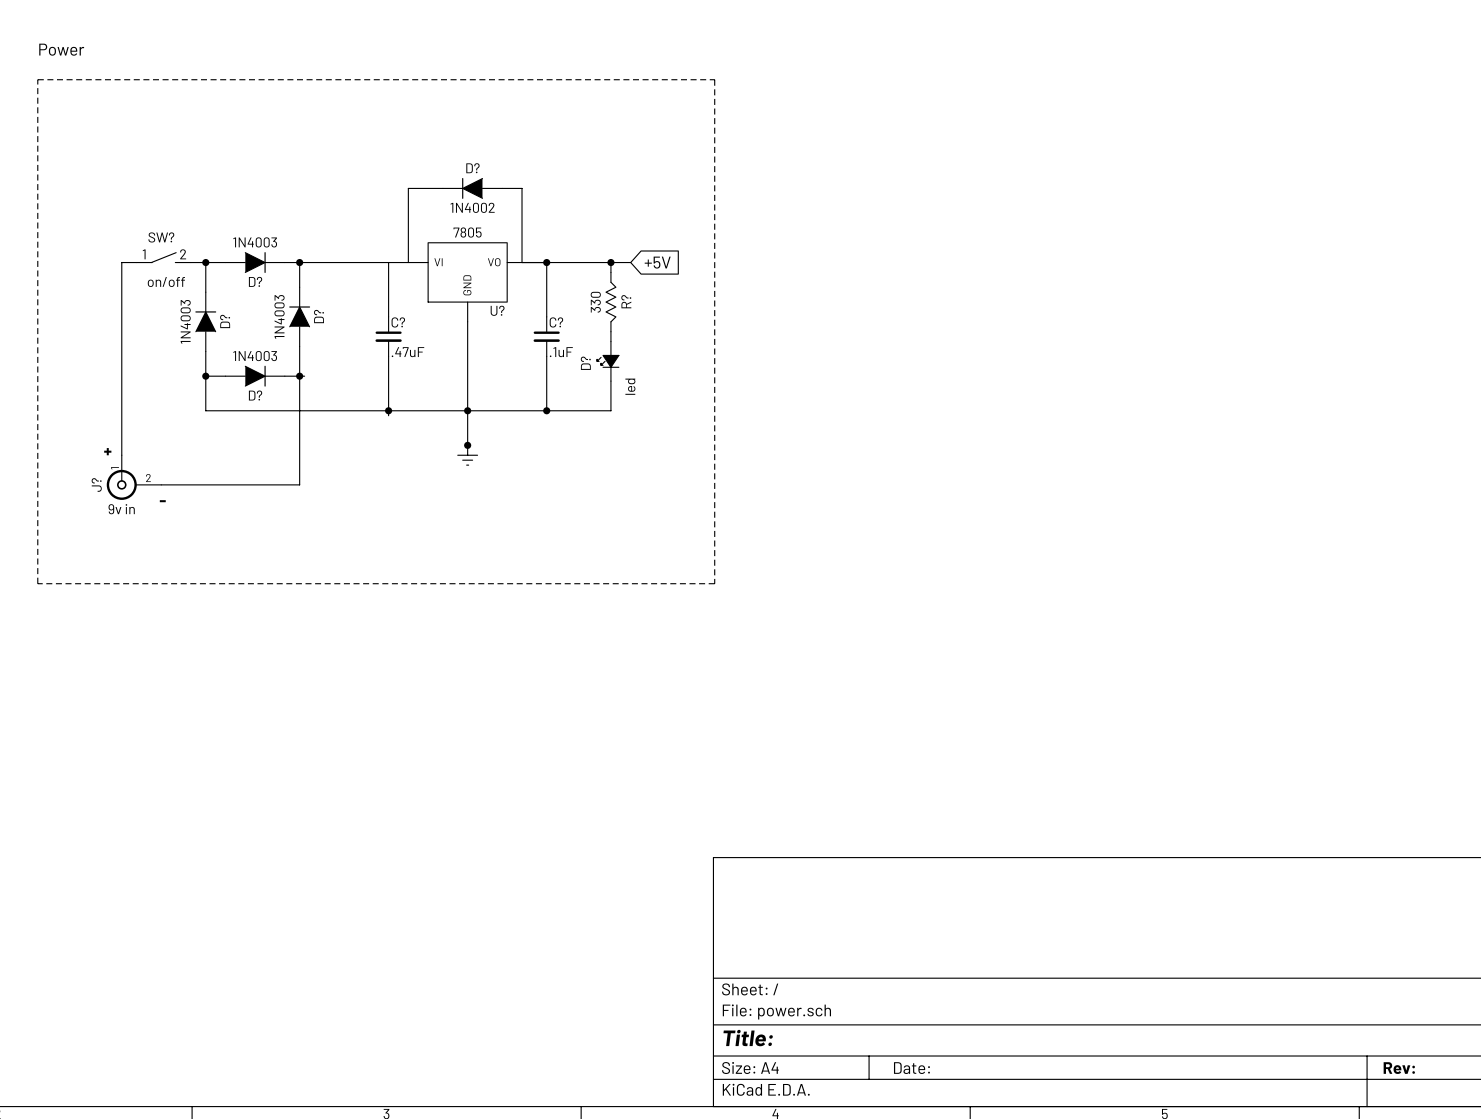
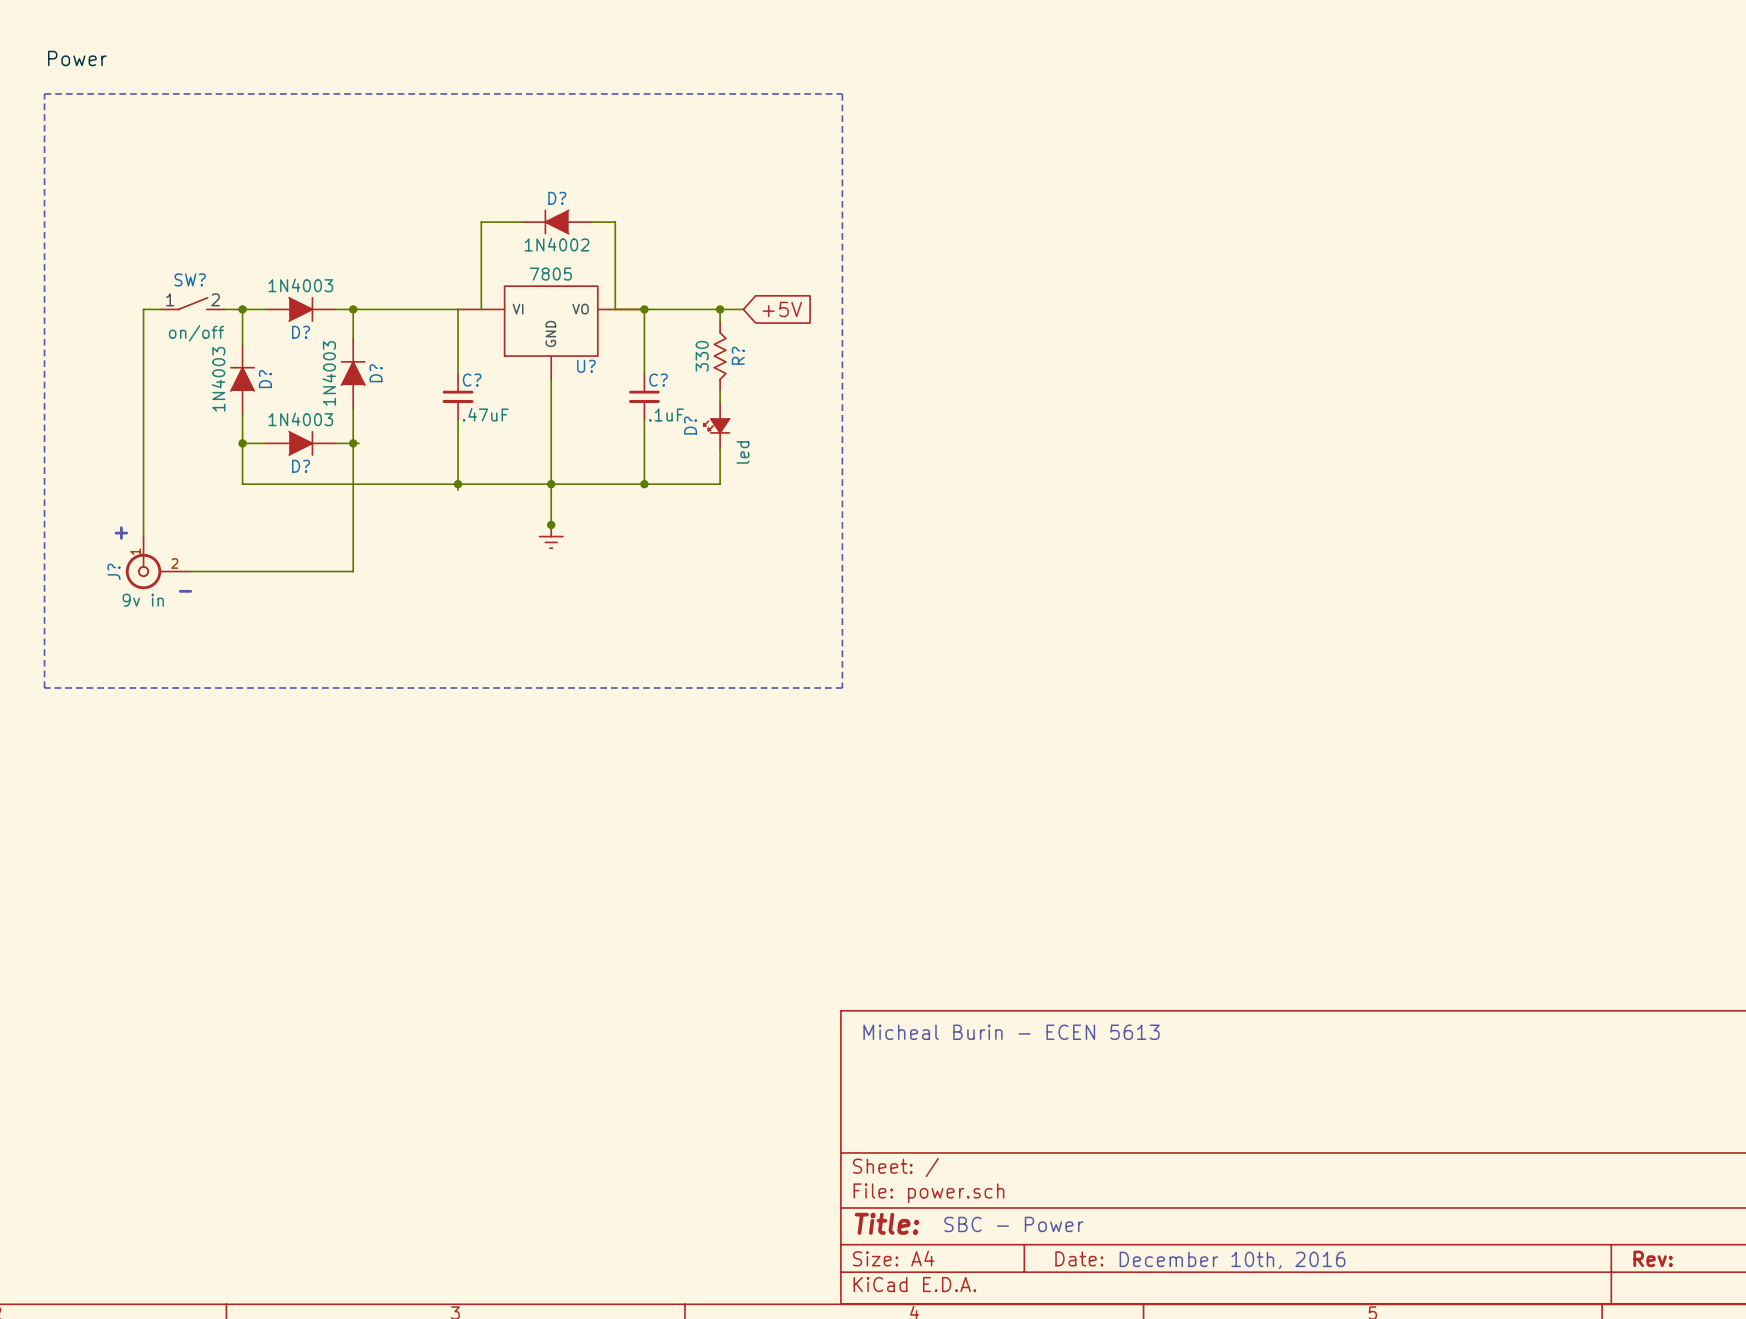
text: none -> Micheal Burin - ECEN 5613 (1011, 1032)
text: none -> SBC - Power (1013, 1224)
text: none -> December 10th, 2016 (1232, 1260)

